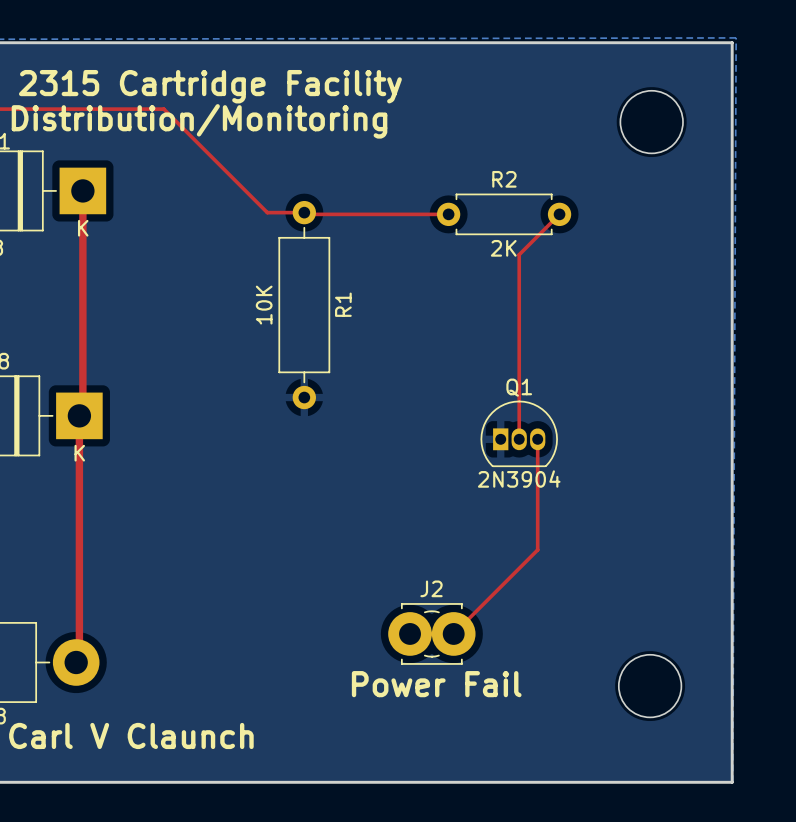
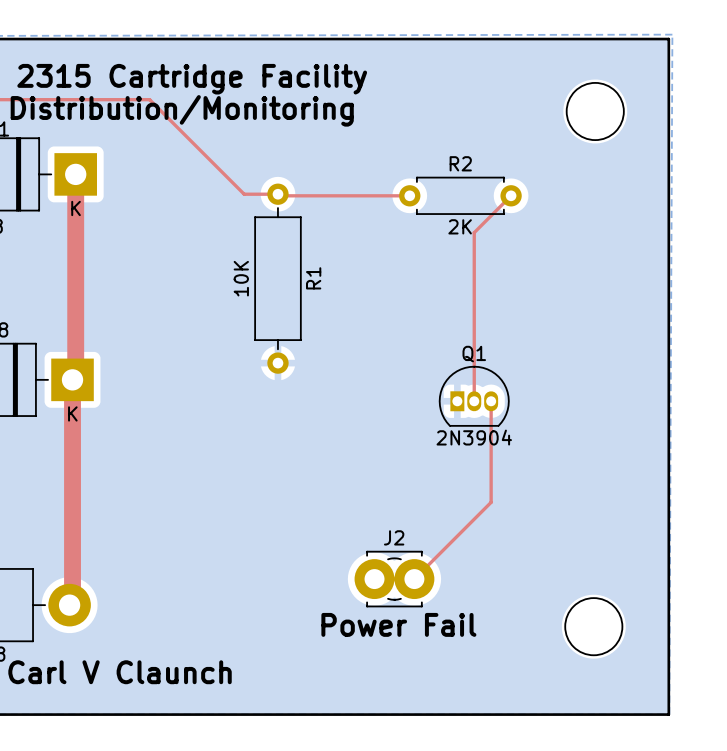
top track width: thin (82, 190) (82, 412) -> thick (75, 174) (75, 376)
top track width: thin (79, 415) (79, 659) -> thick (72, 379) (72, 602)

